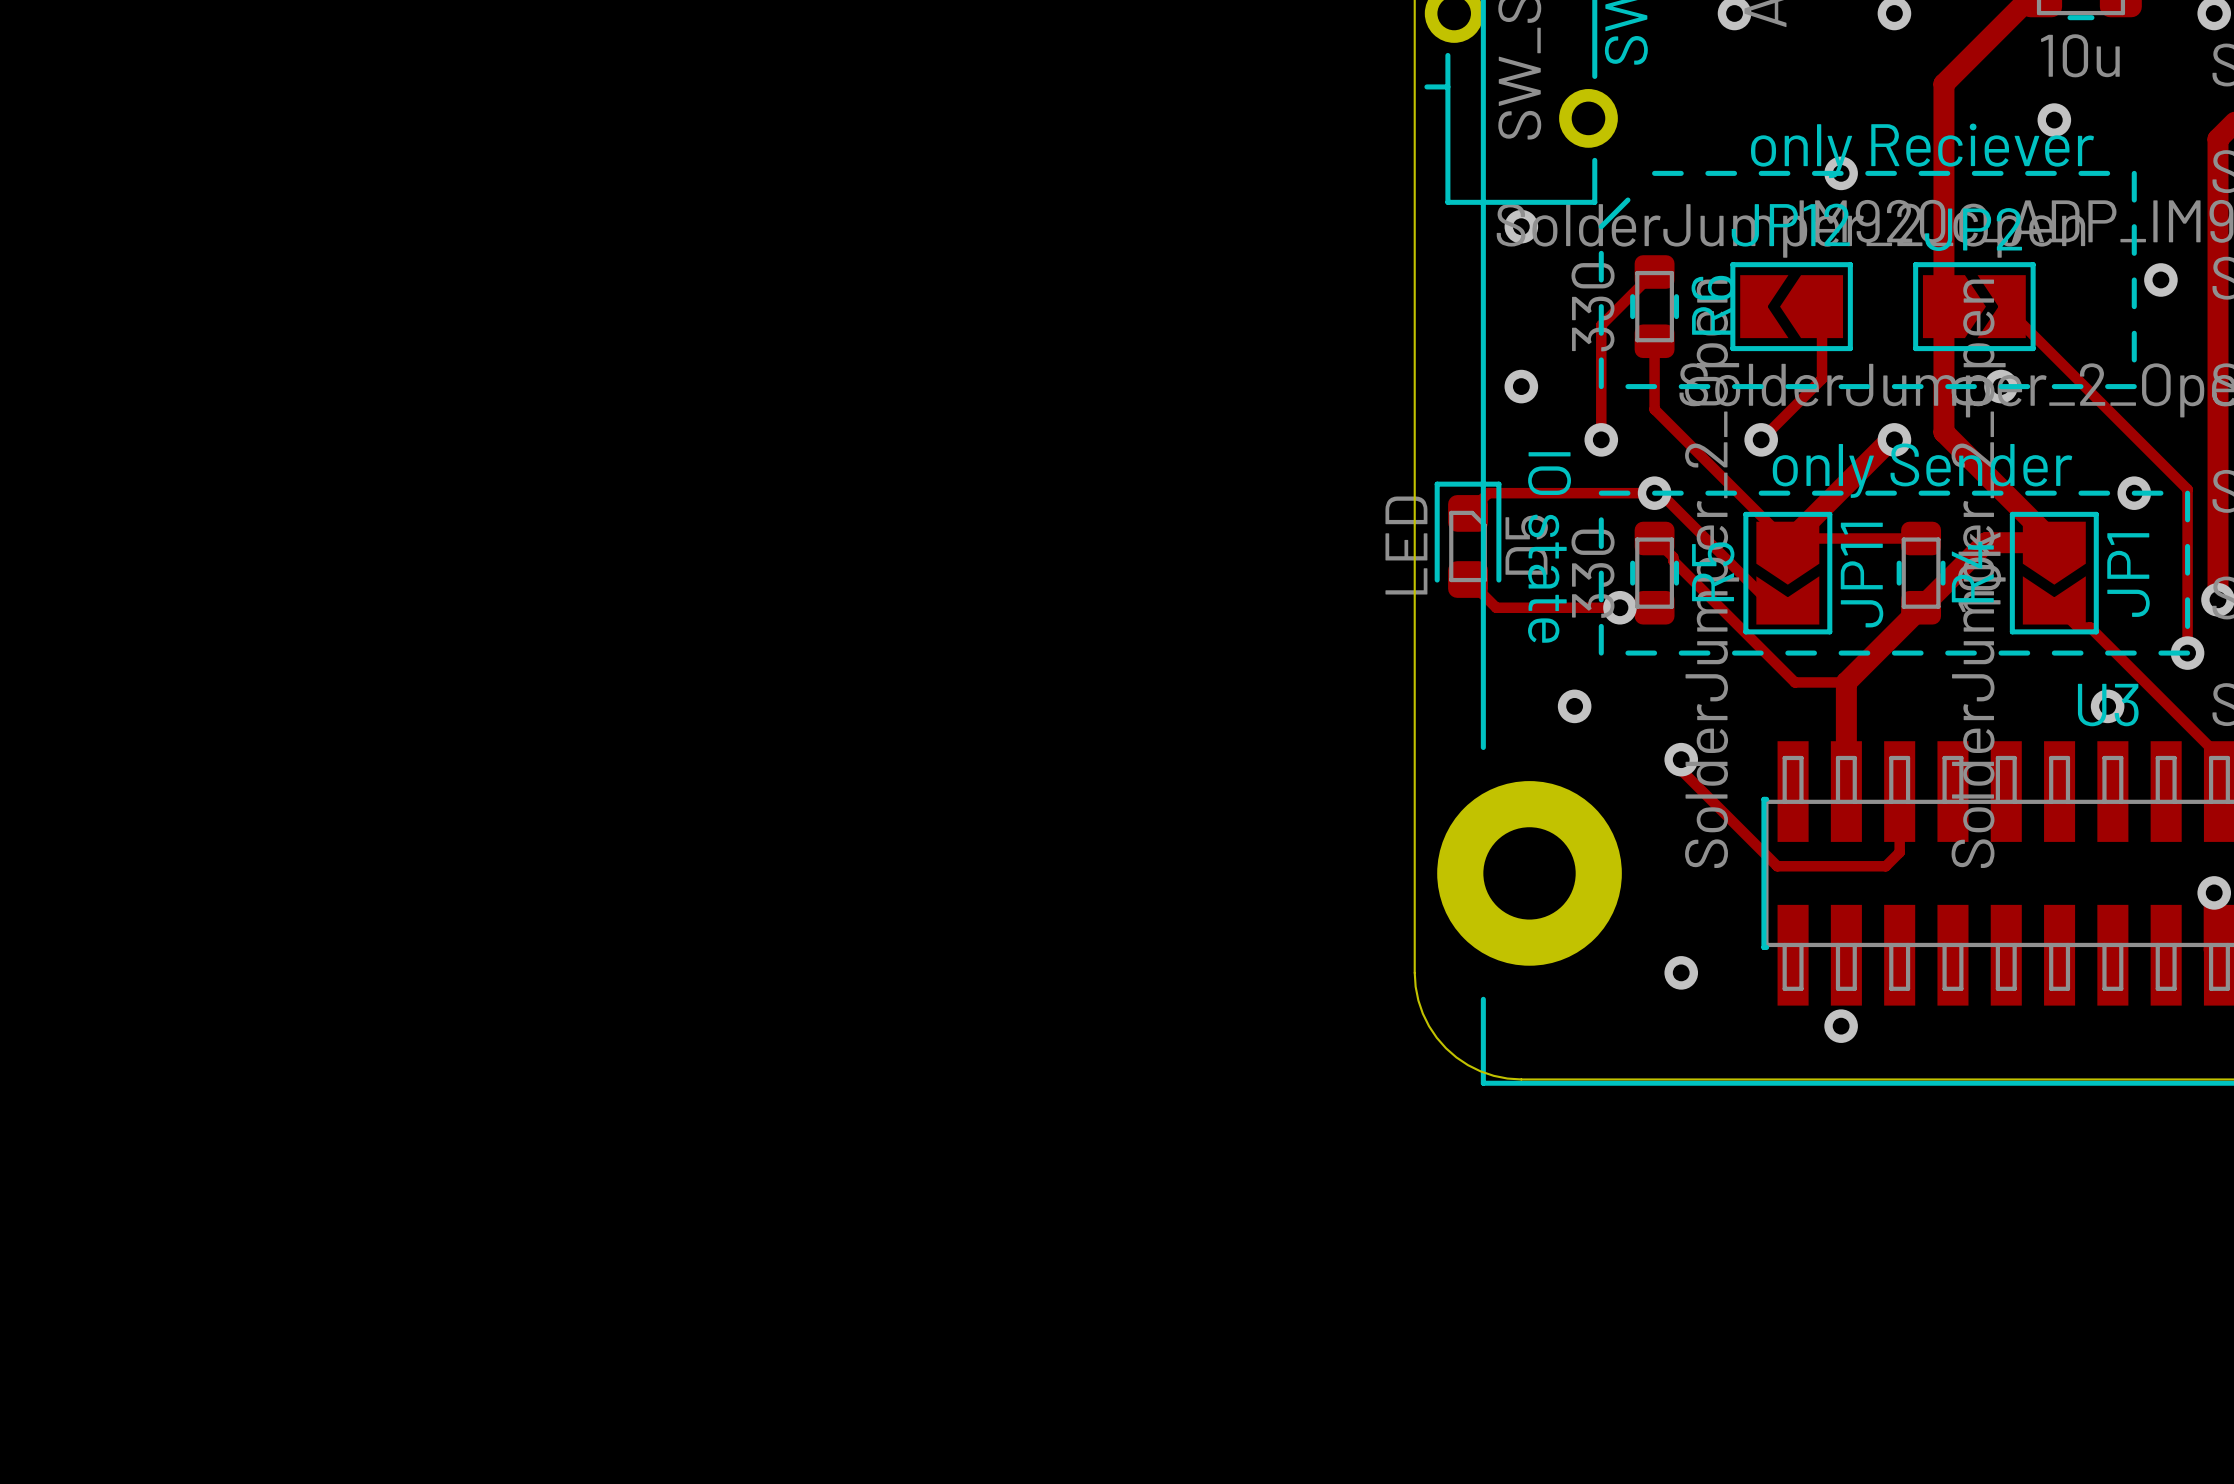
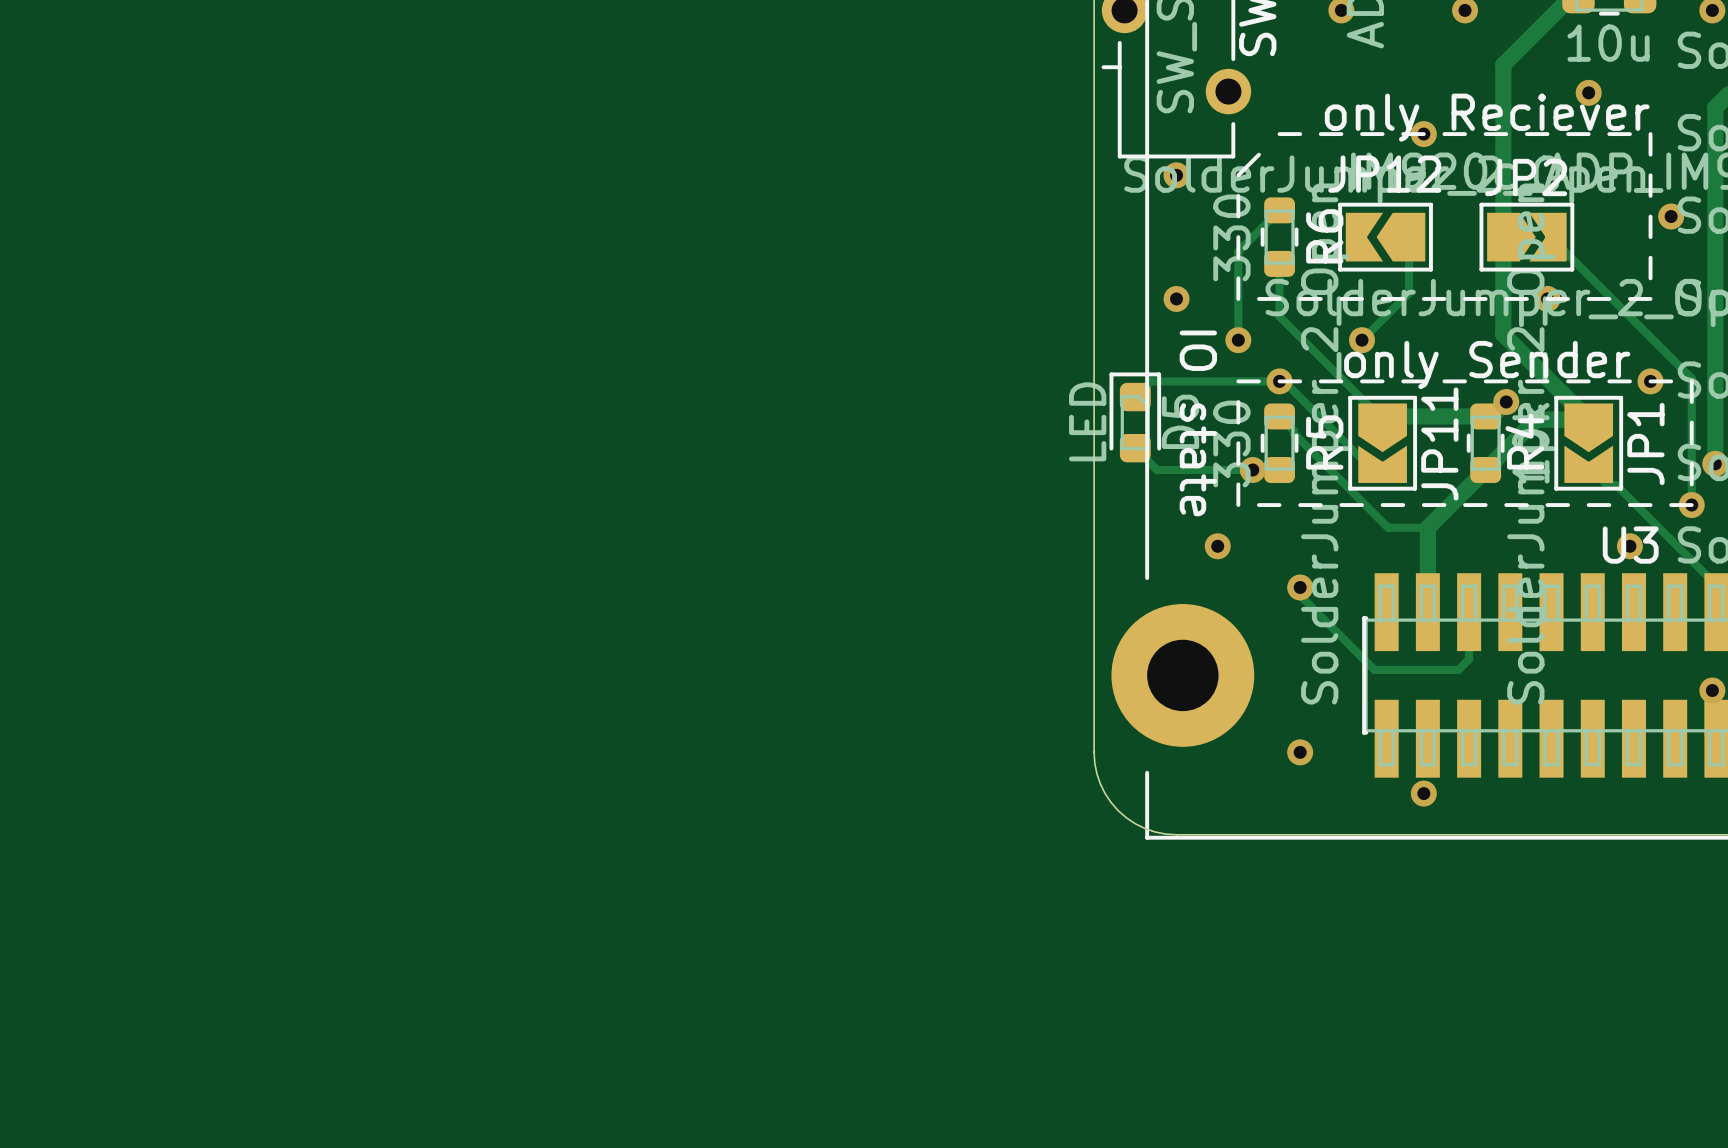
track: (1894, 439) (1890, 439) (1787, 542) -> none
via position: (1894, 439) -> (1506, 402)
track width: thin (1792, 538) (1921, 538) -> thick (1385, 416) (1485, 416)

